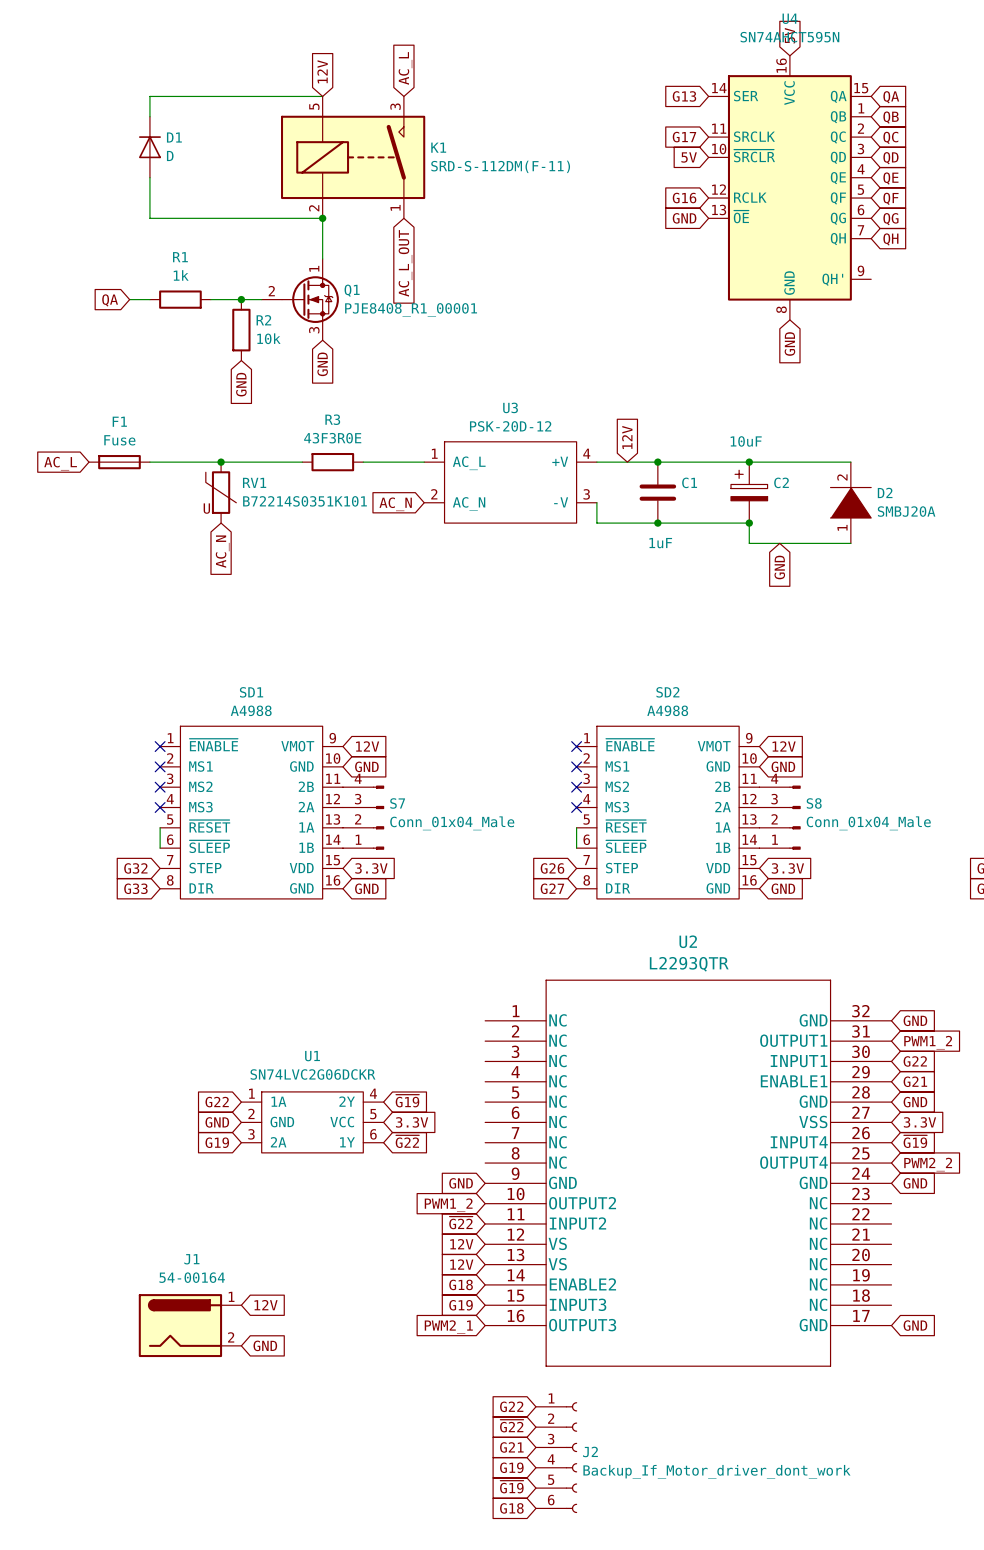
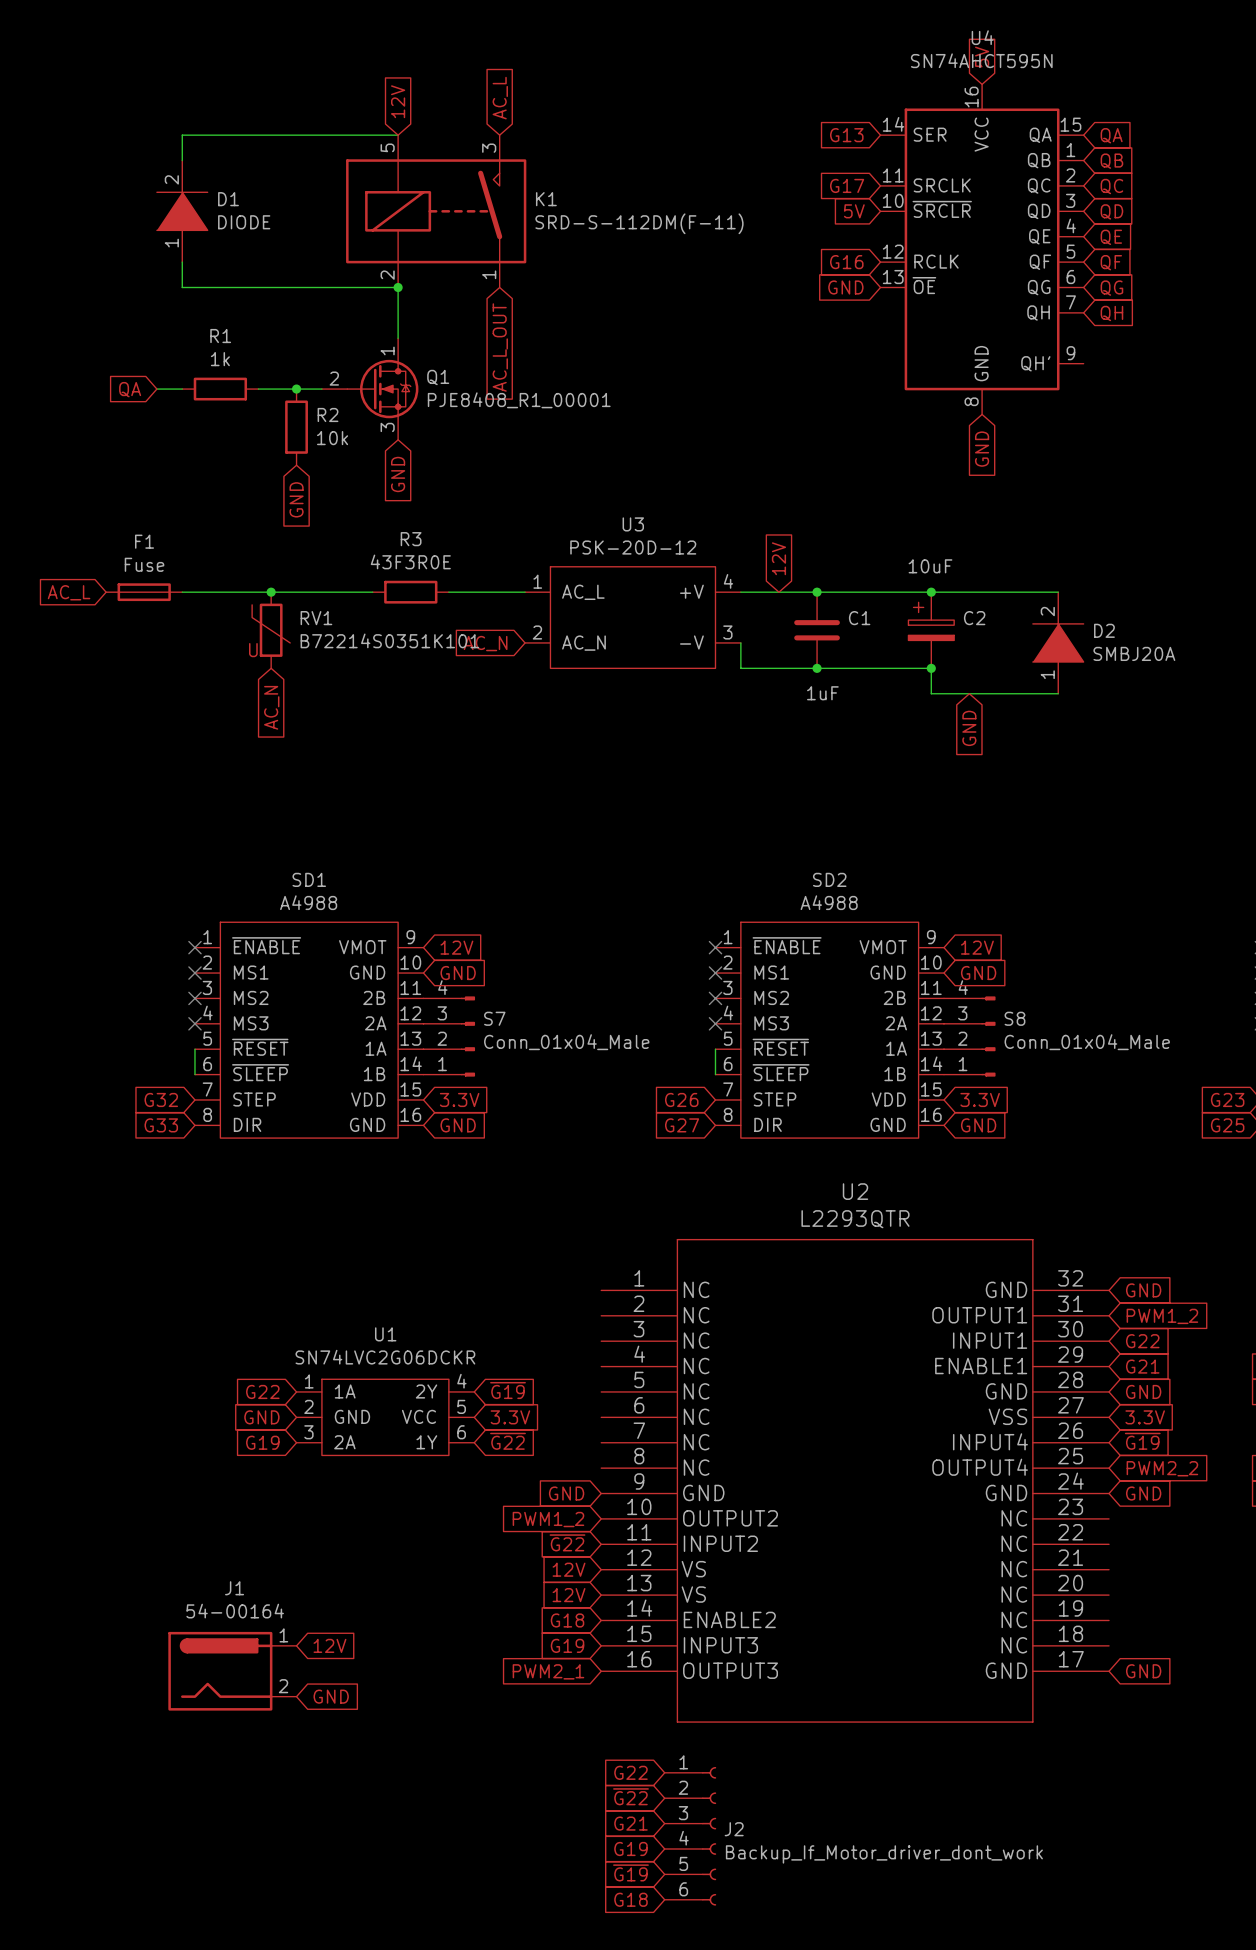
D1 symbol: [138, 116, 161, 178] -> [156, 160, 208, 263]
D1 value: D (170, 155) -> DIODE (244, 222)

